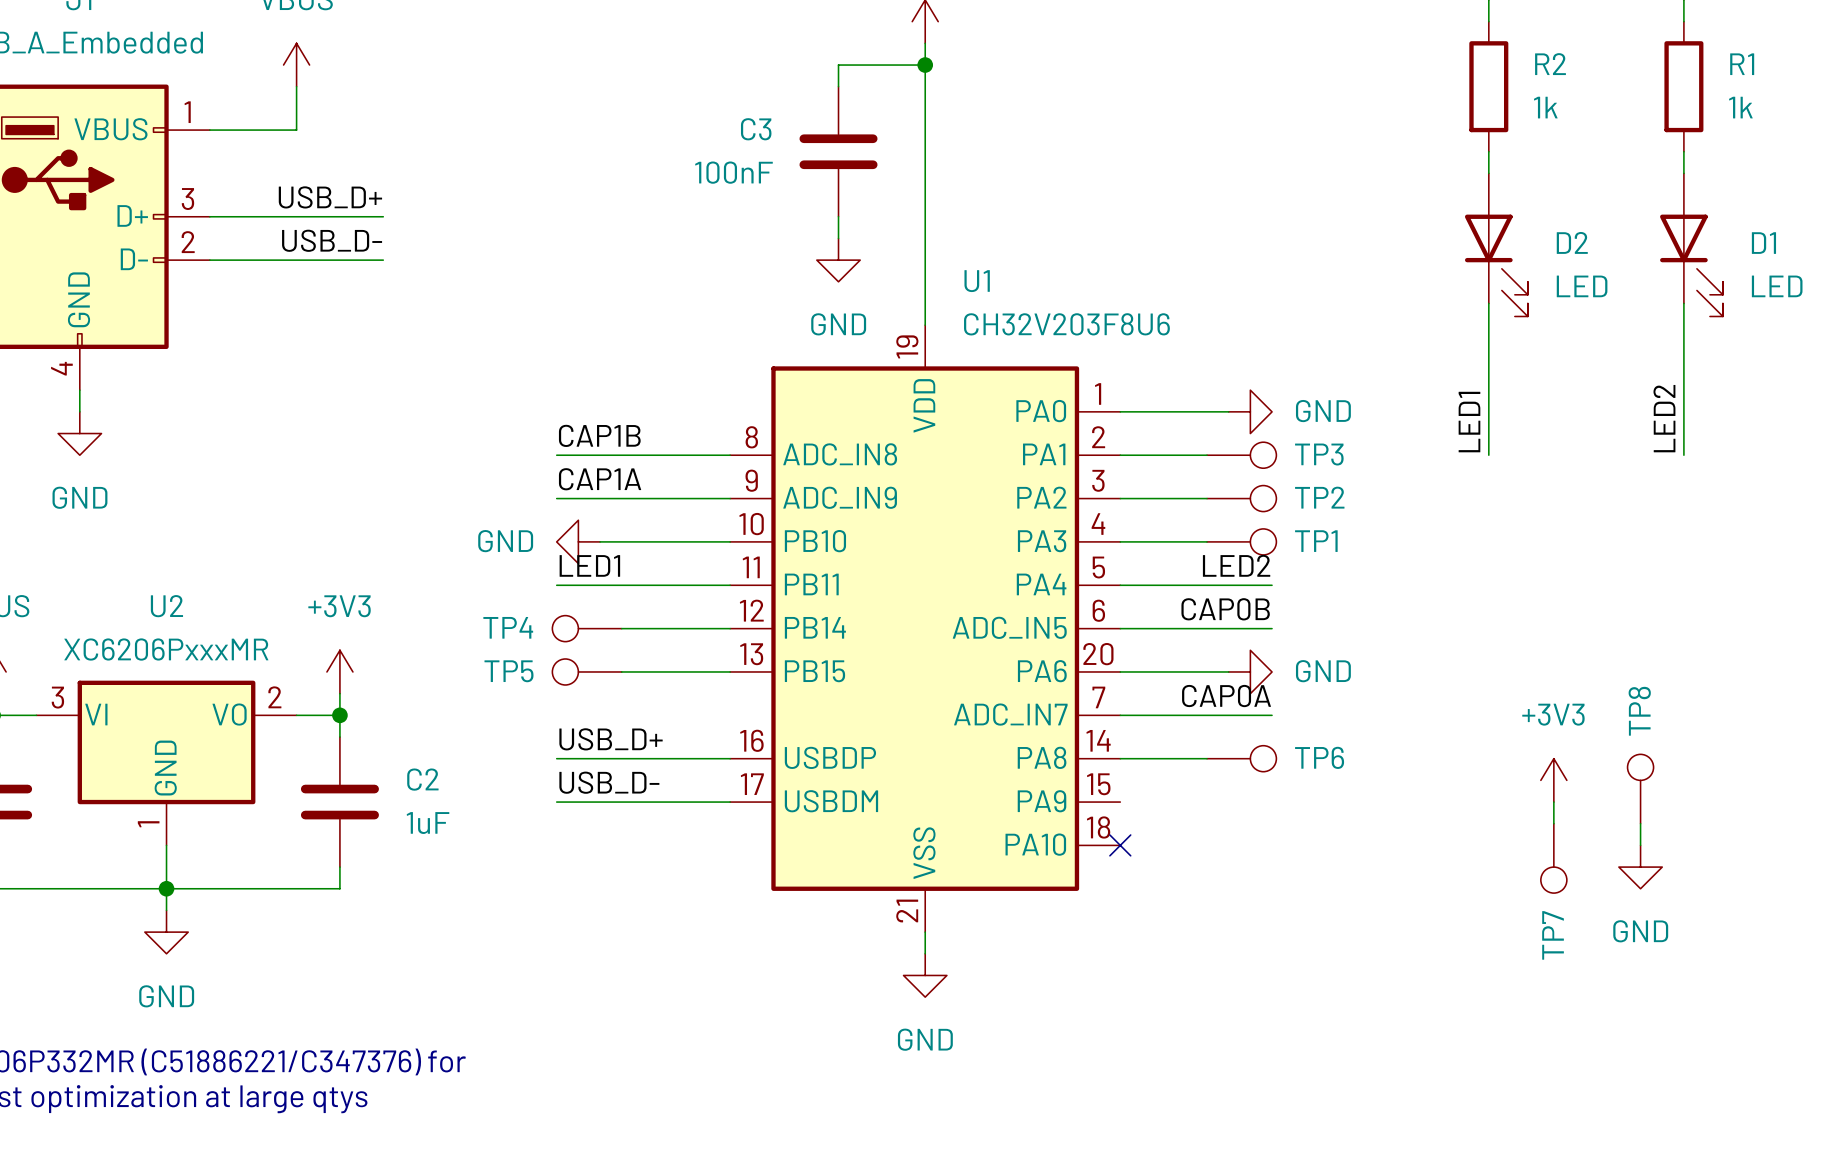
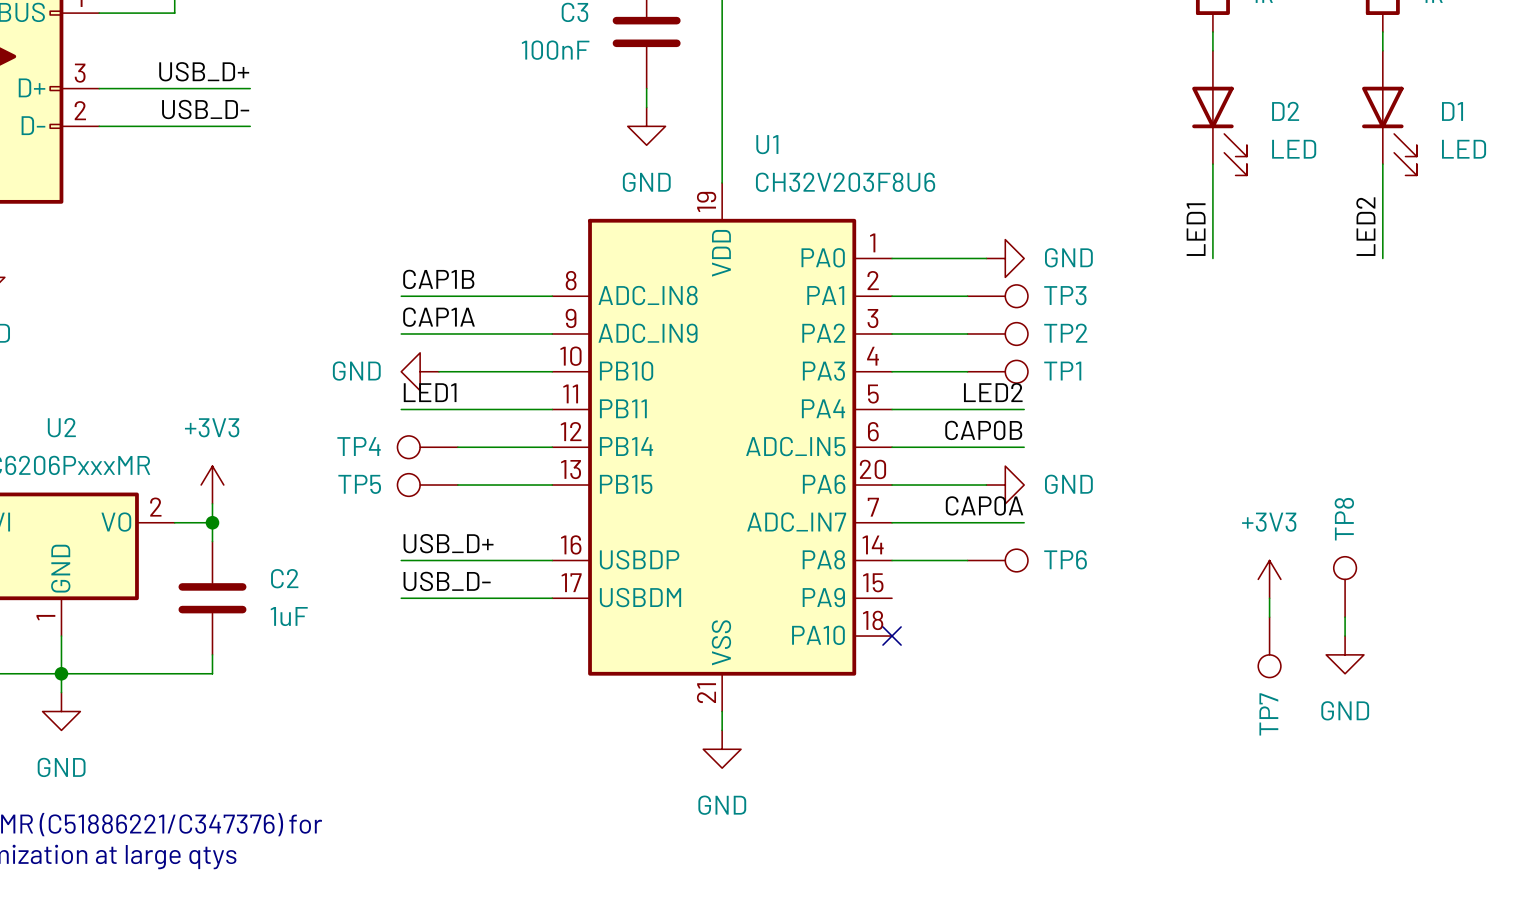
wire: (1488, 411) (1488, 455) -> none
wire: (1683, 411) (1683, 455) -> none
label position: LED2 (1664, 418) -> LED2 (1365, 226)
label position: LED1 (1469, 422) -> LED1 (1196, 229)

